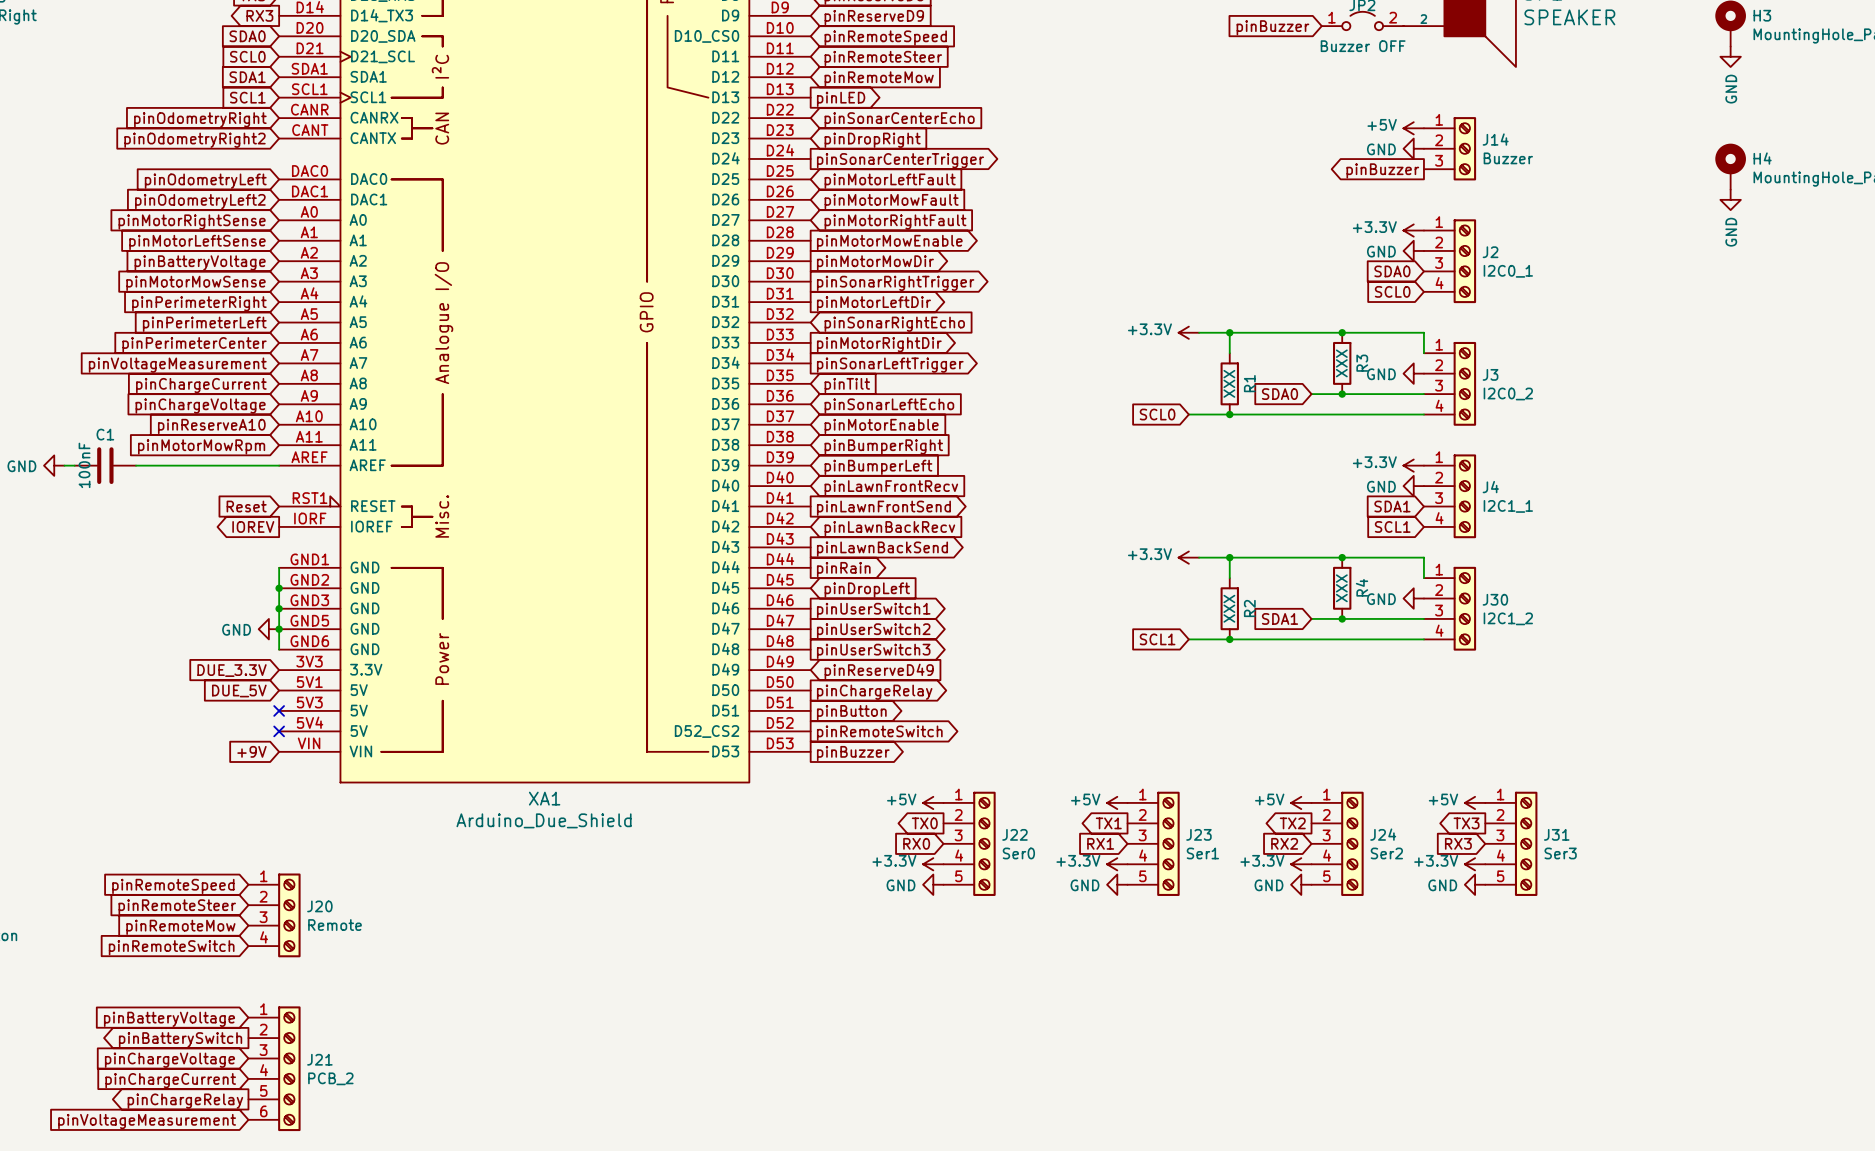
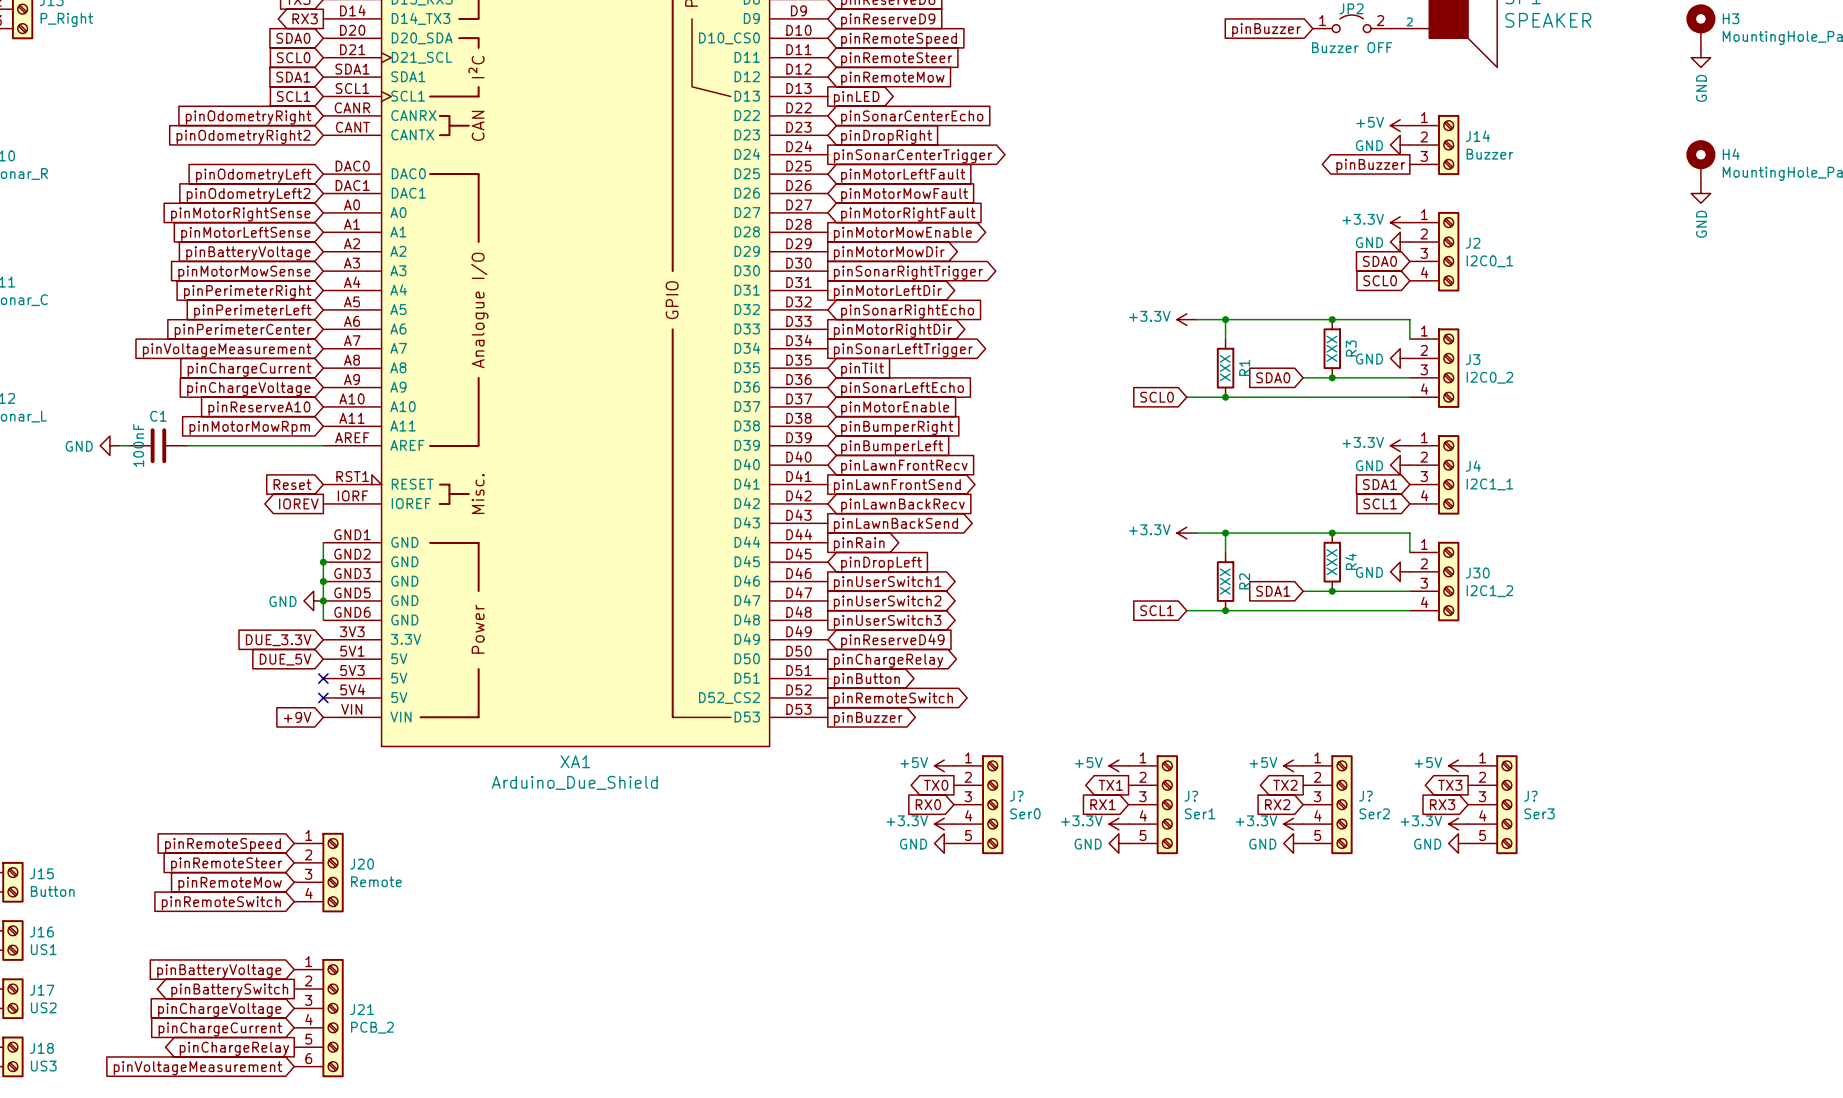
J22 name: J22 (1014, 834) -> J? (1016, 796)
J23 name: J23 (1198, 834) -> J? (1191, 796)
J24 name: J24 (1383, 834) -> J? (1365, 796)
J31 name: J31 (1556, 834) -> J? (1530, 796)

